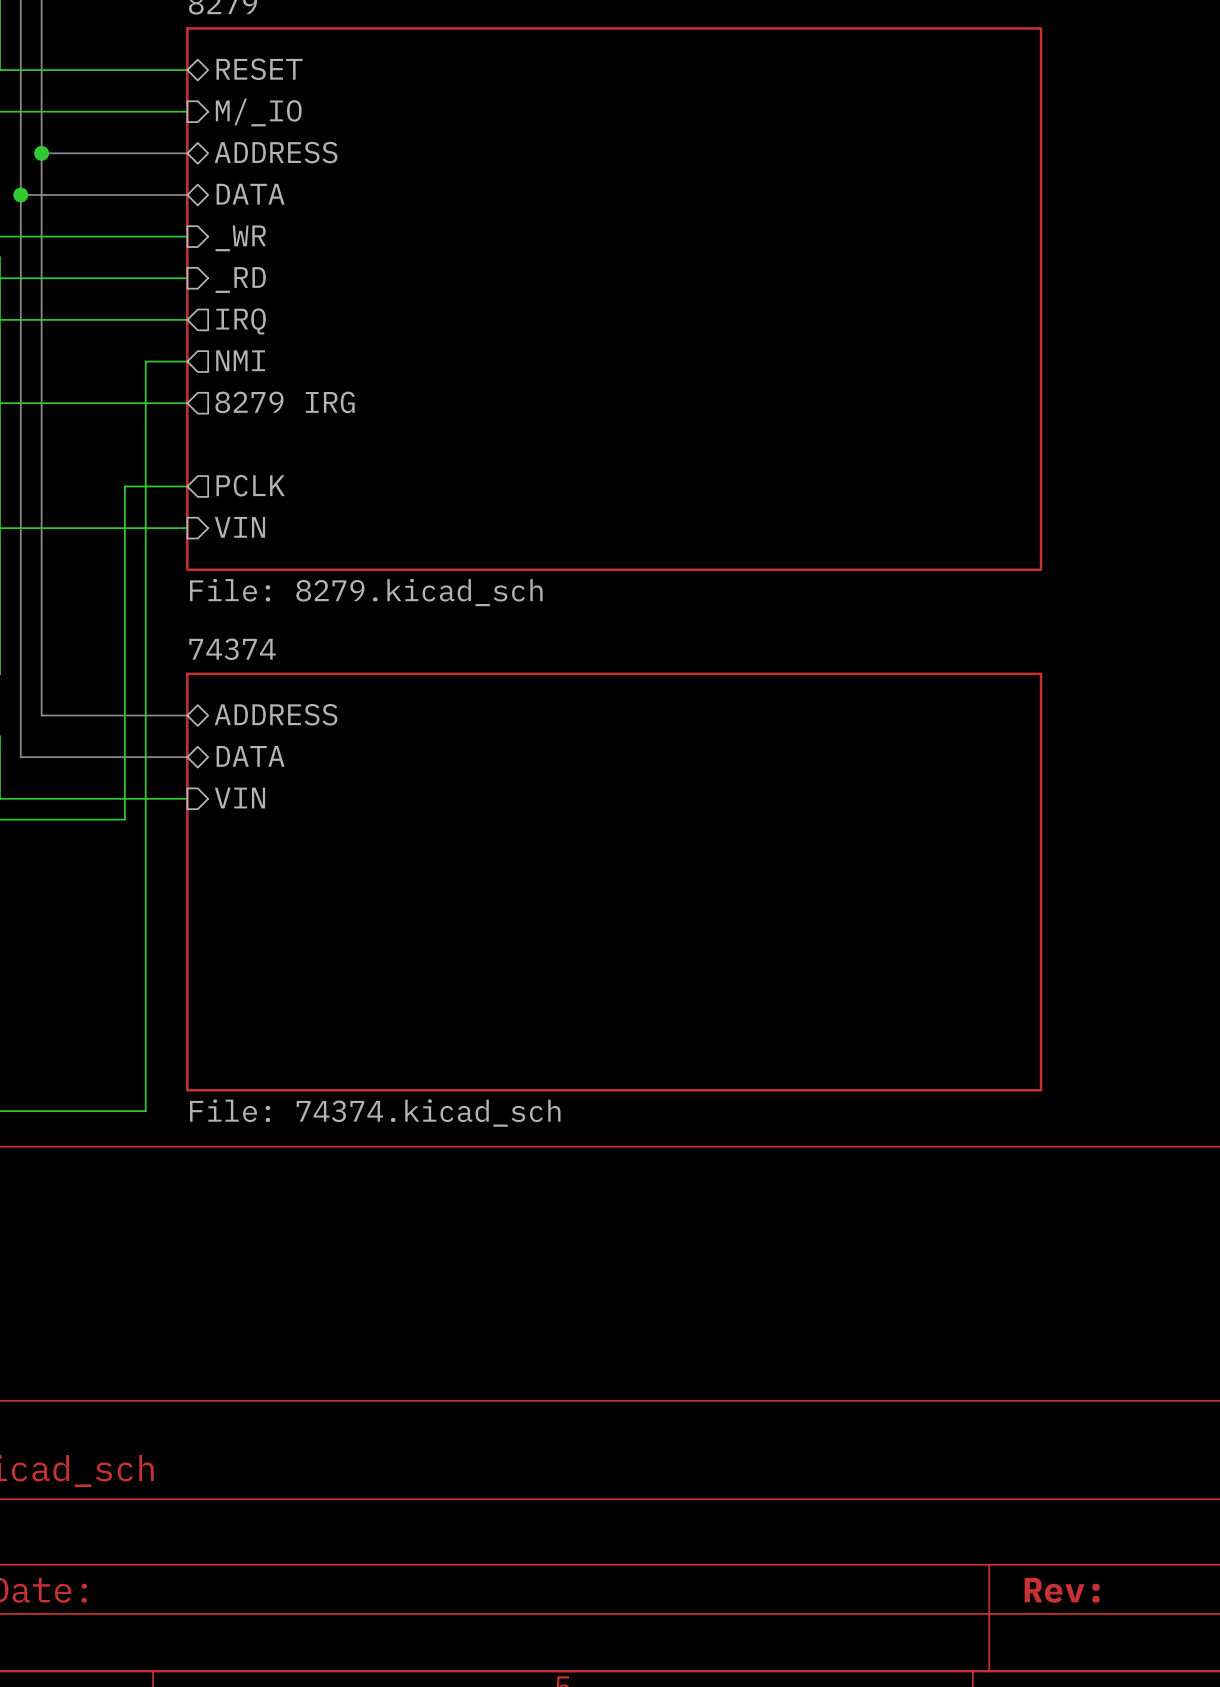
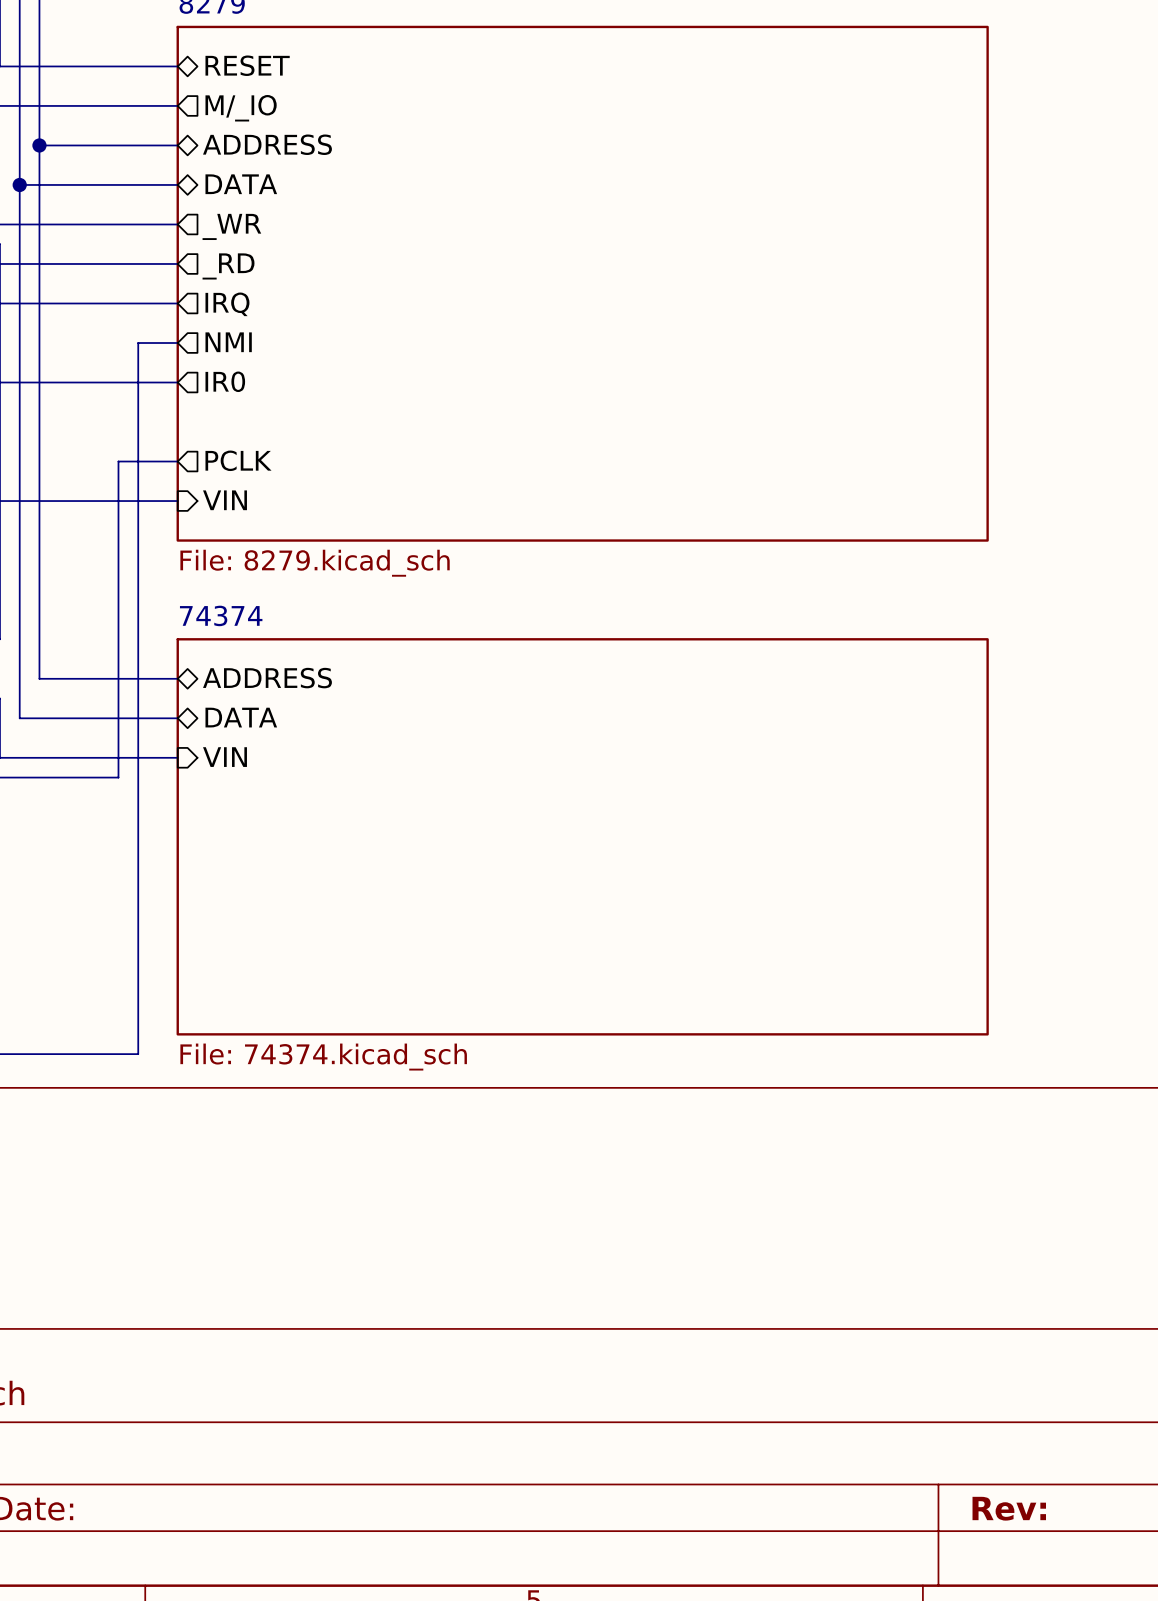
sheet pin shape: input (258, 112) -> output (241, 108)
sheet pin shape: input (240, 238) -> output (231, 226)
sheet pin shape: input (240, 280) -> output (228, 266)
sheet pin: 8279 IRG (285, 402) -> IR0 (225, 381)

